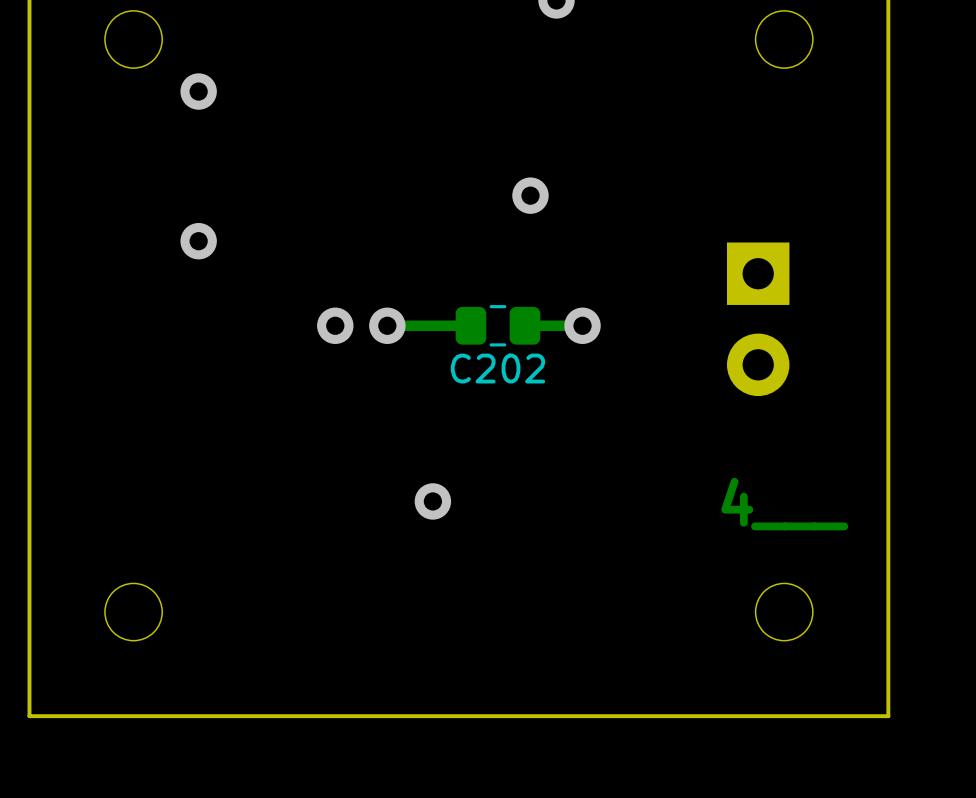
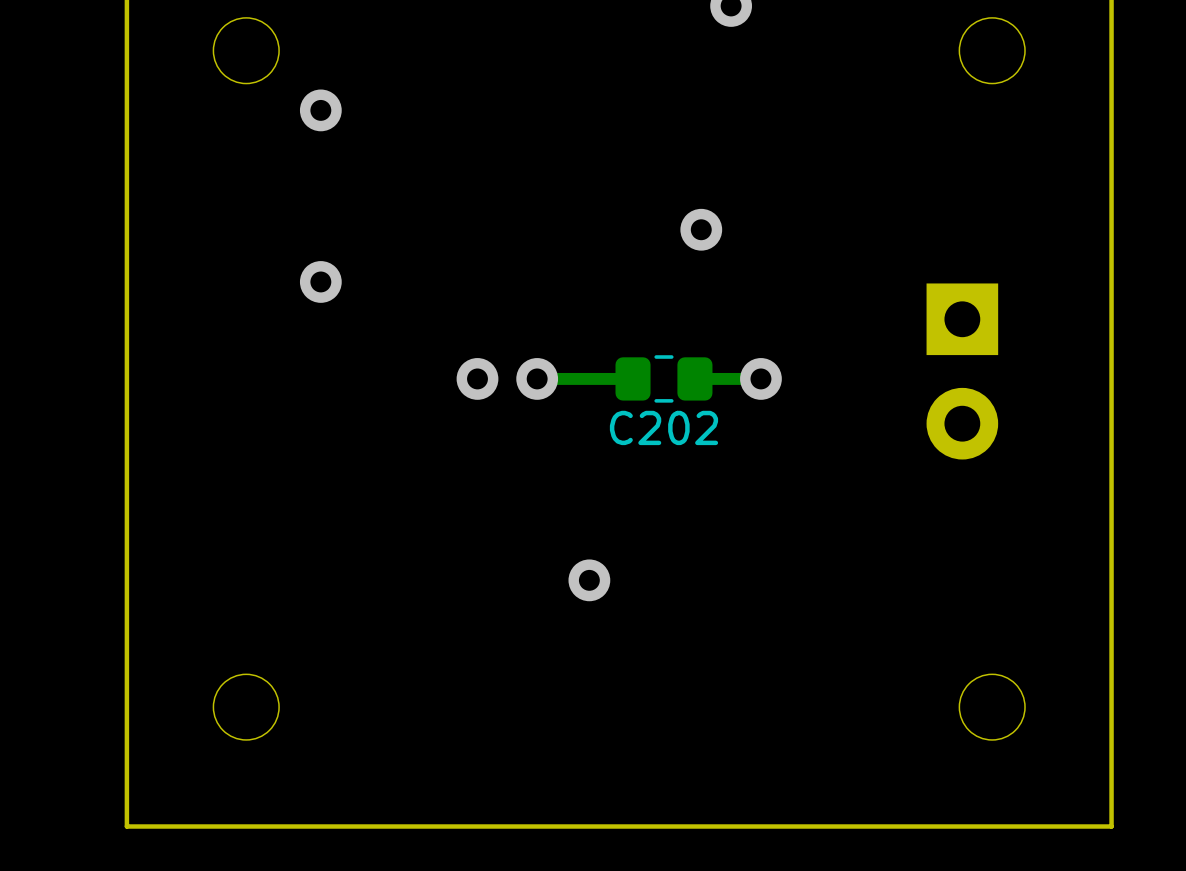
text: 4___ (784, 504) -> none

